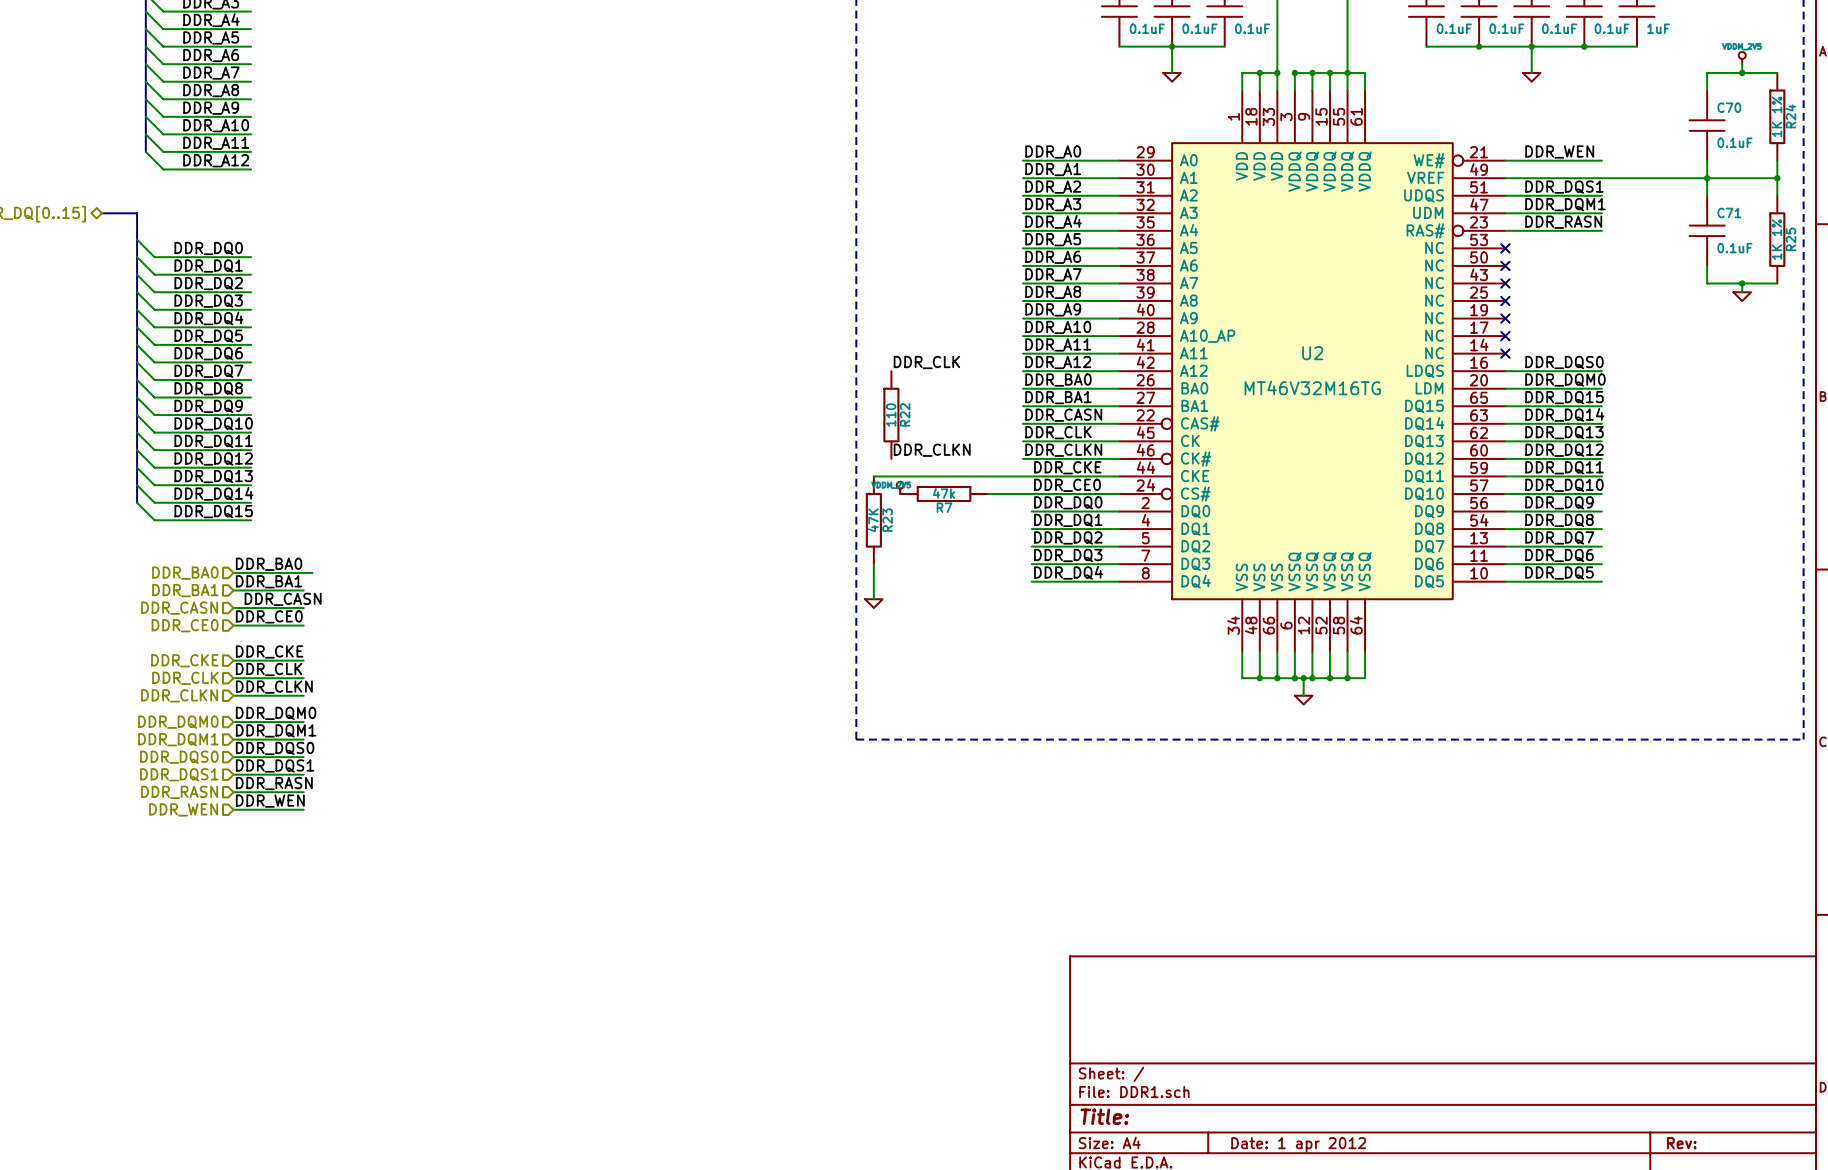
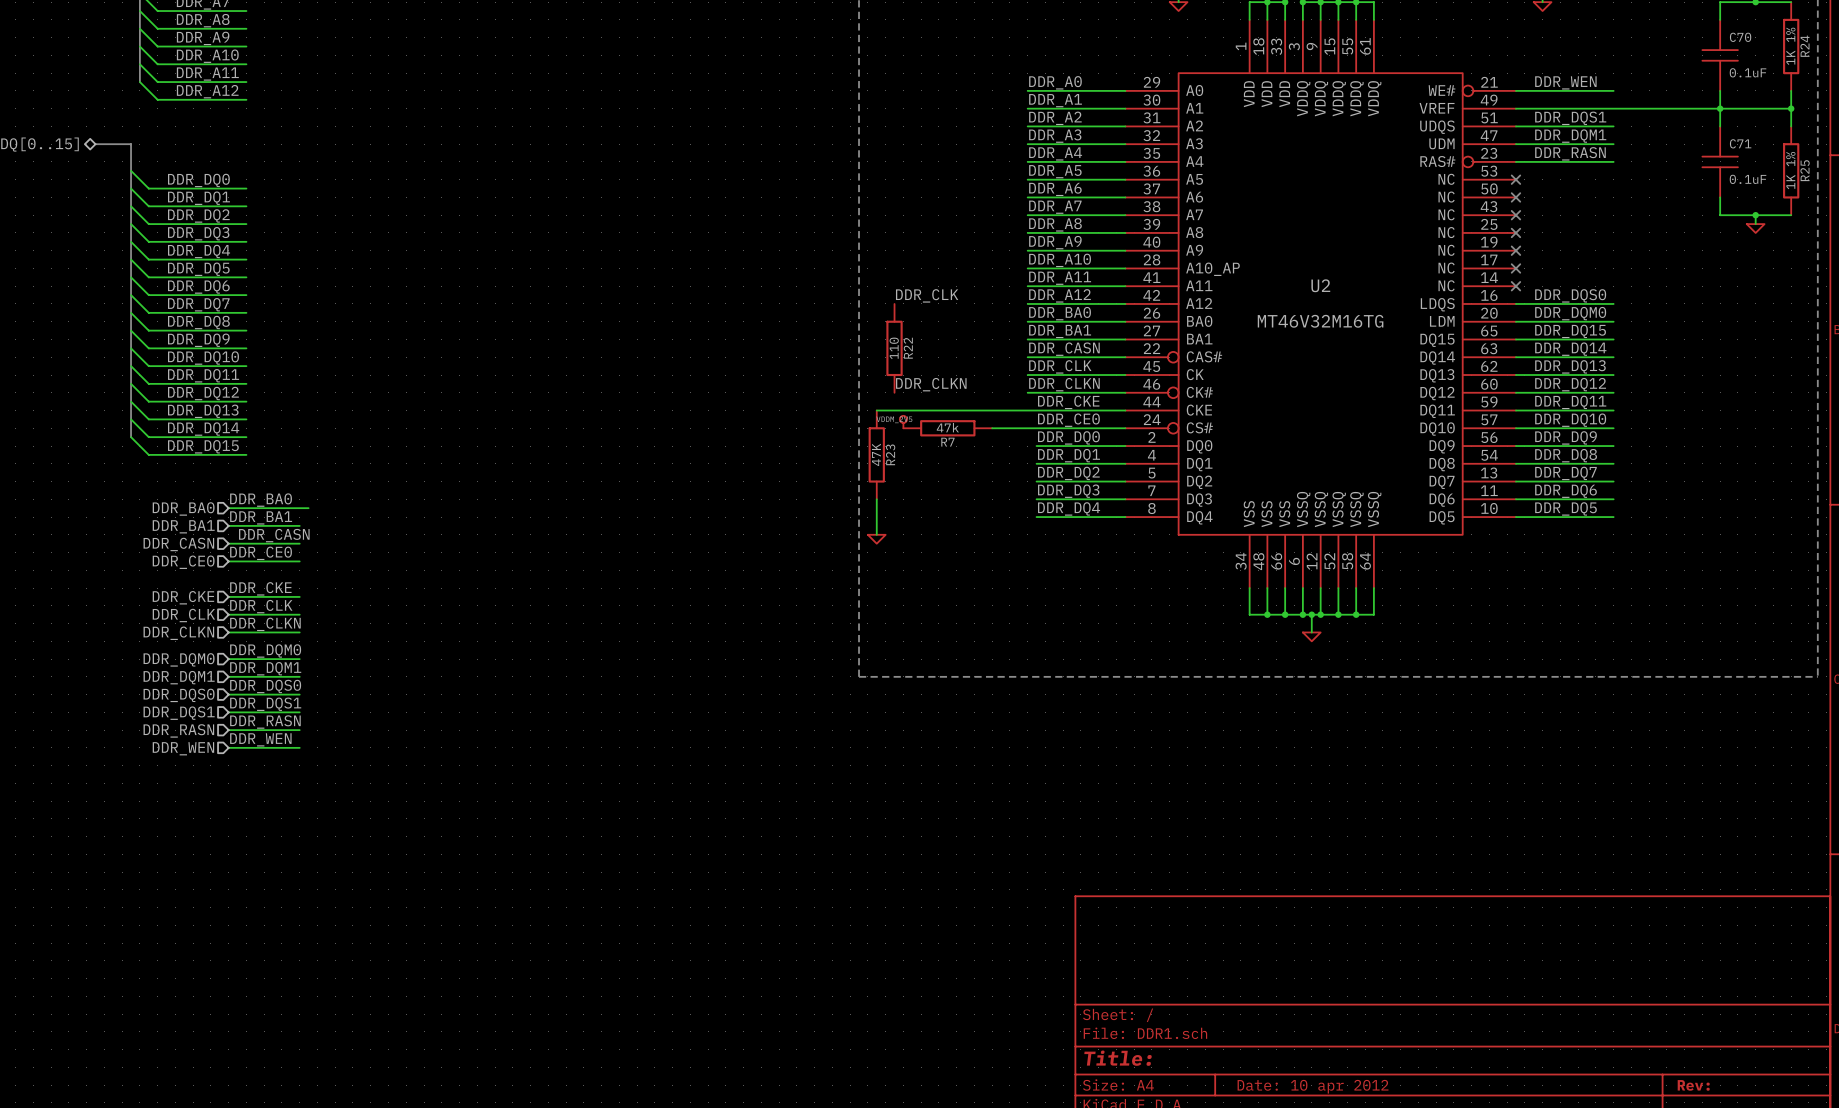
title block: Date: 1 apr 2012 (1298, 1144) -> Date: 10 apr 2012 (1313, 1086)

